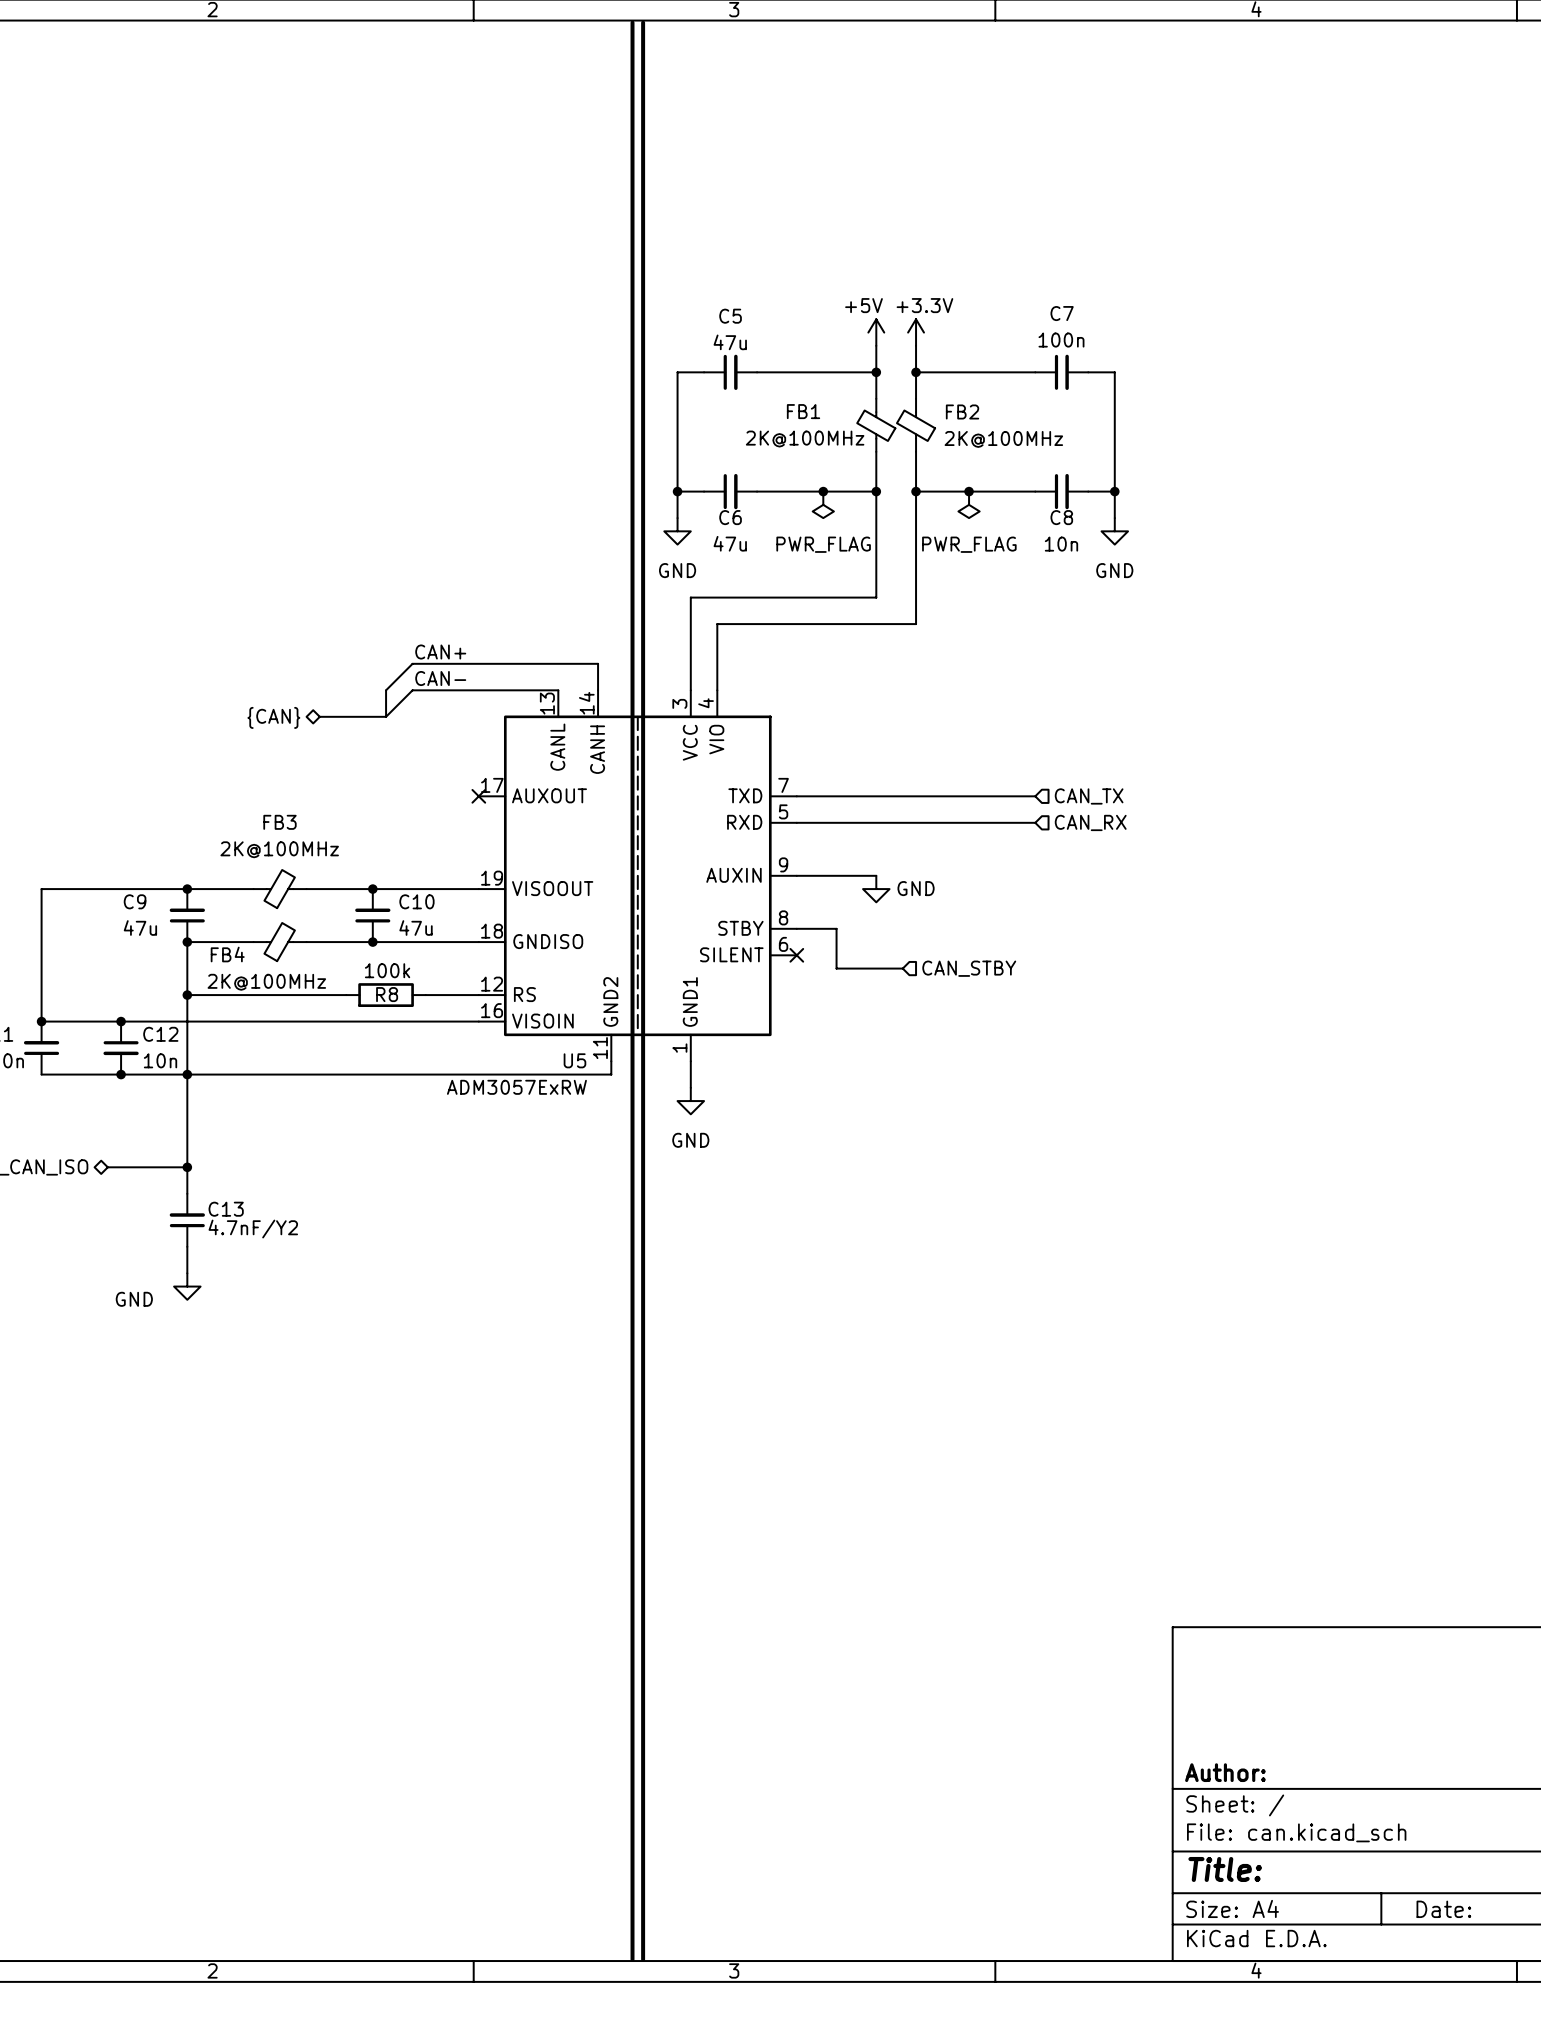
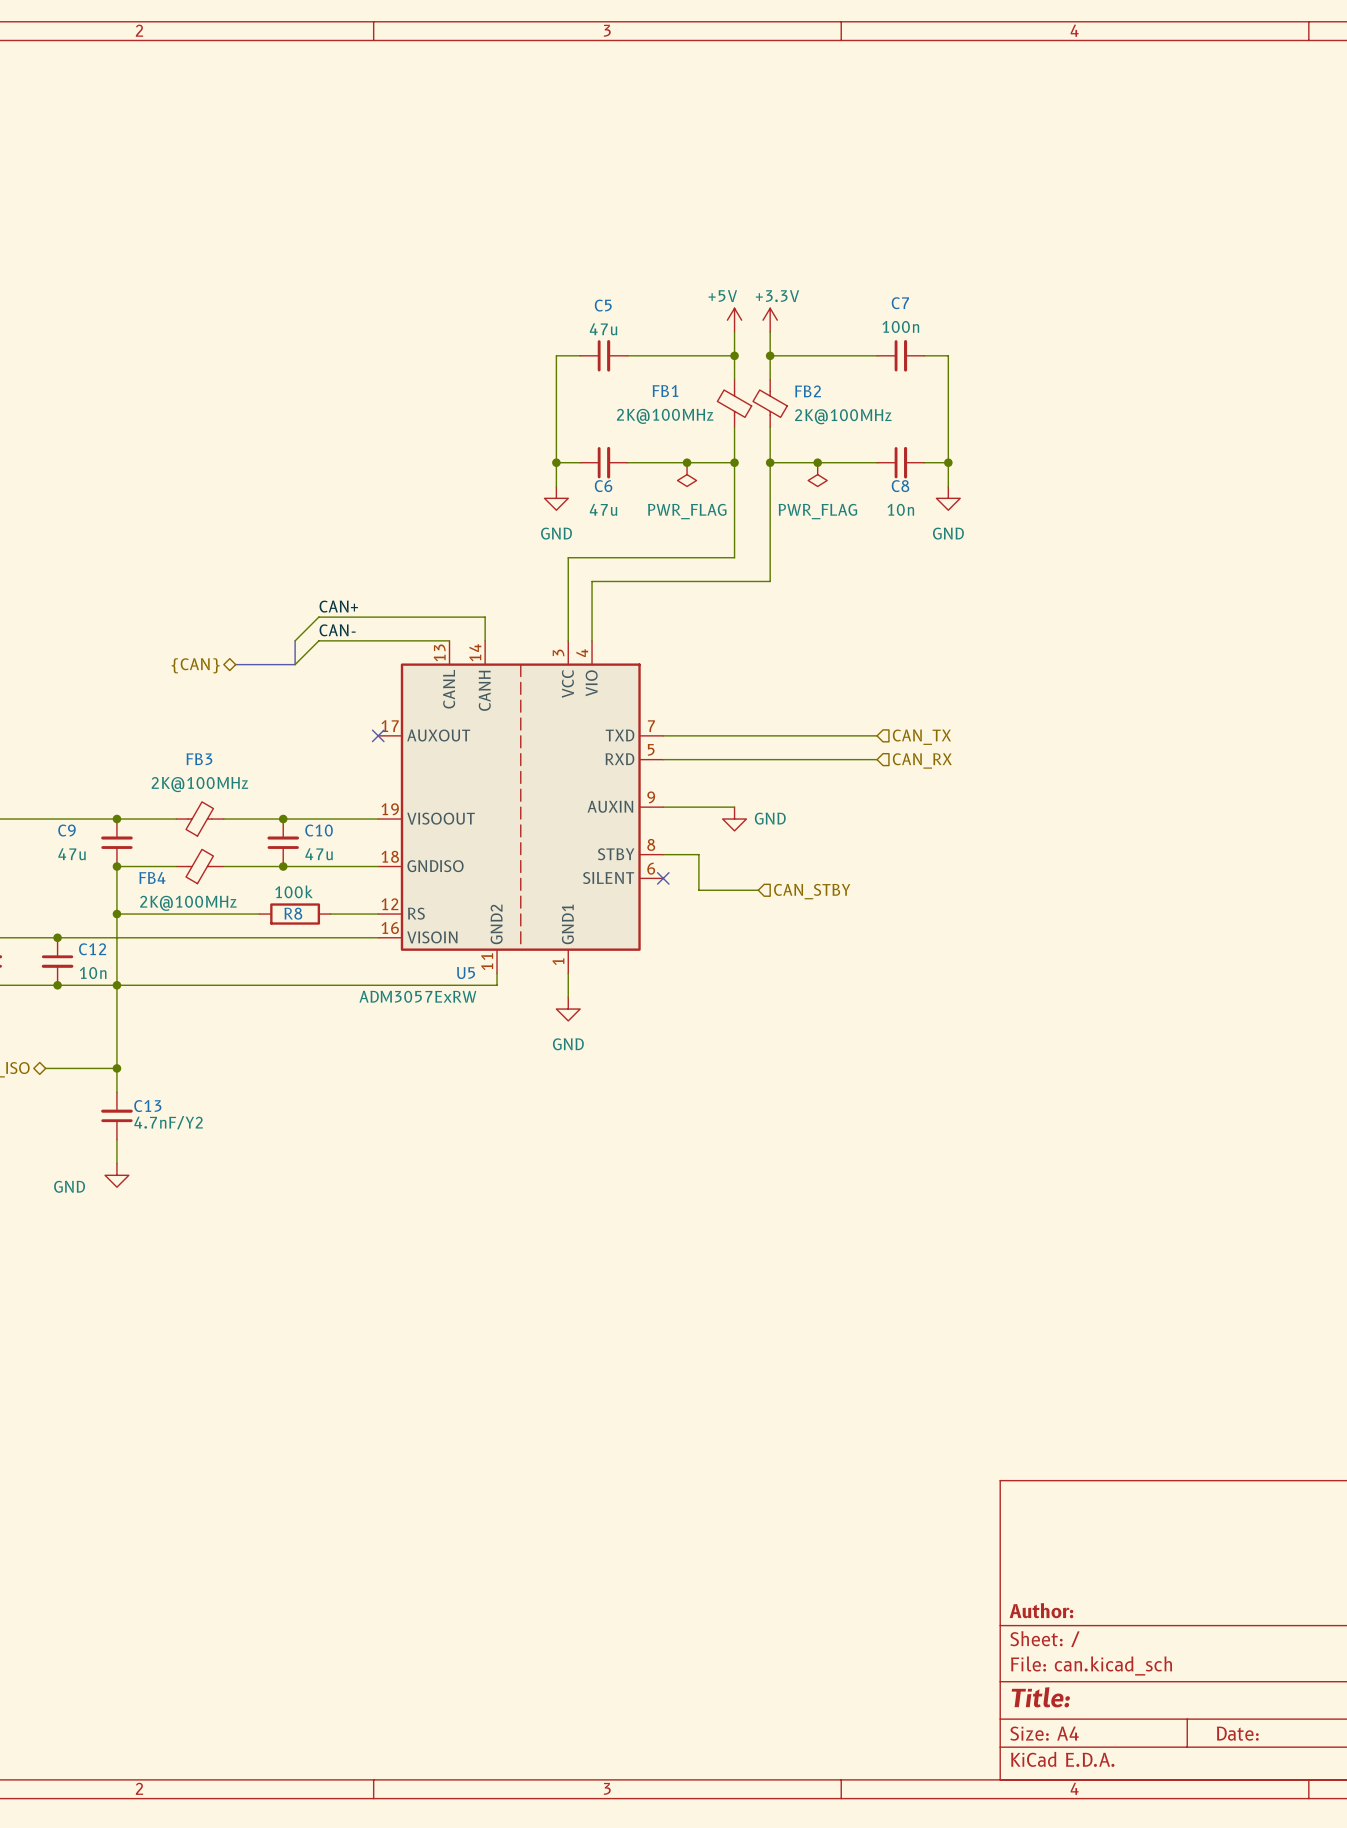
line: (632, 22) (632, 1959) -> none
line: (643, 22) (643, 1959) -> none

